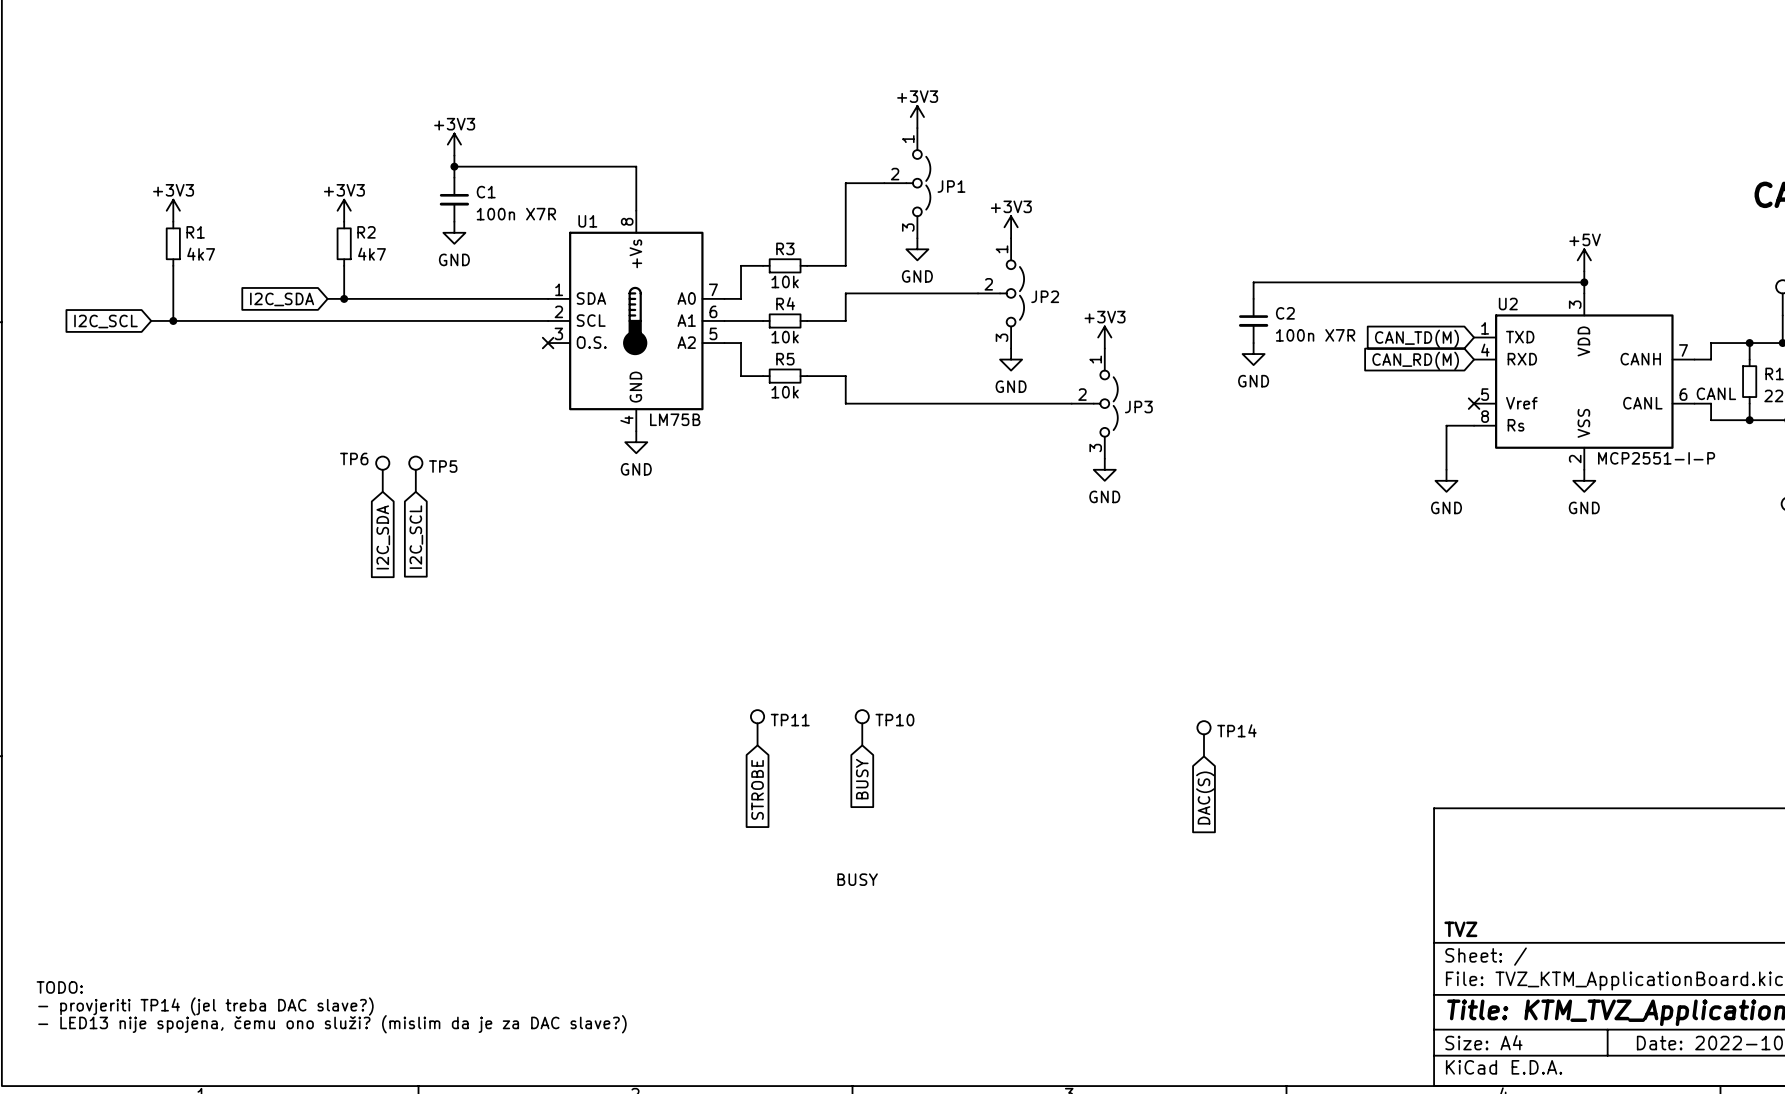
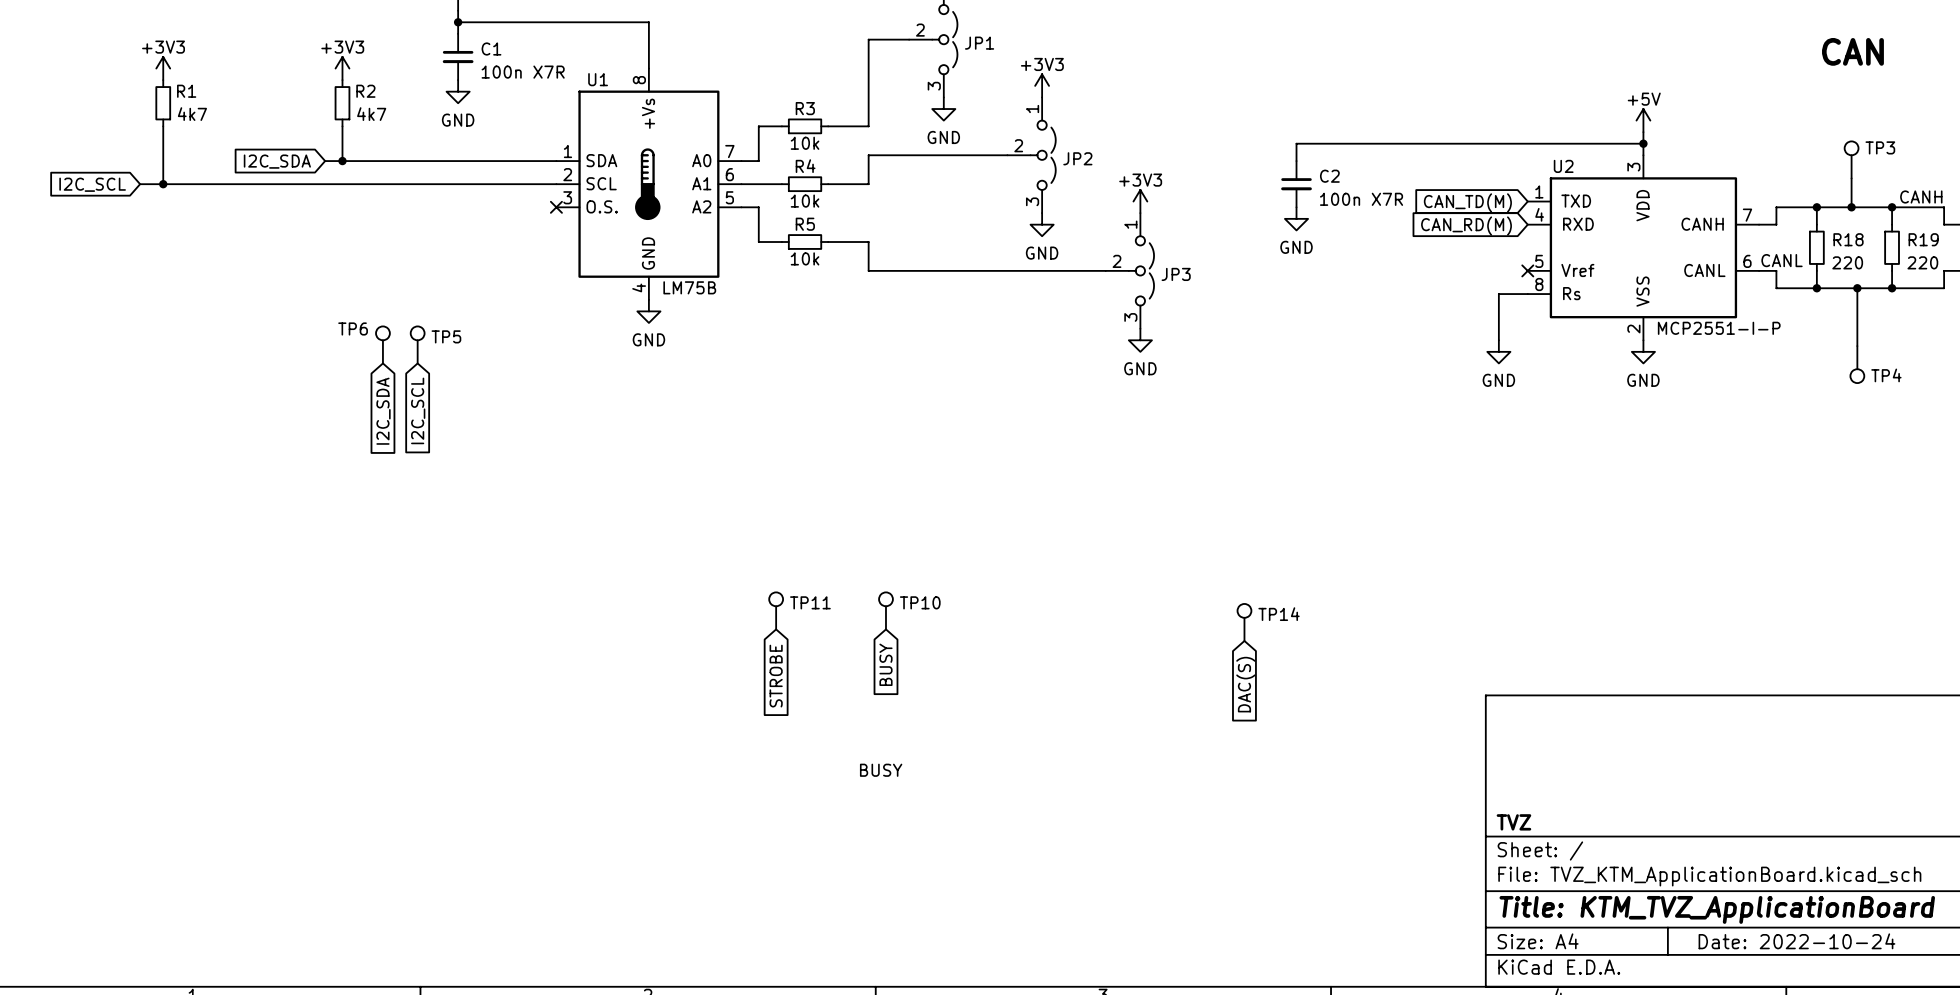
text: TODO: (59, 987) -> none
text: - provjeriti TP14 (jel treba DAC slave?) (205, 1006) -> none
text: - LED13 nije spojena, čemu ono služi? (mislim da je za DAC slave?) (332, 1024) -> none

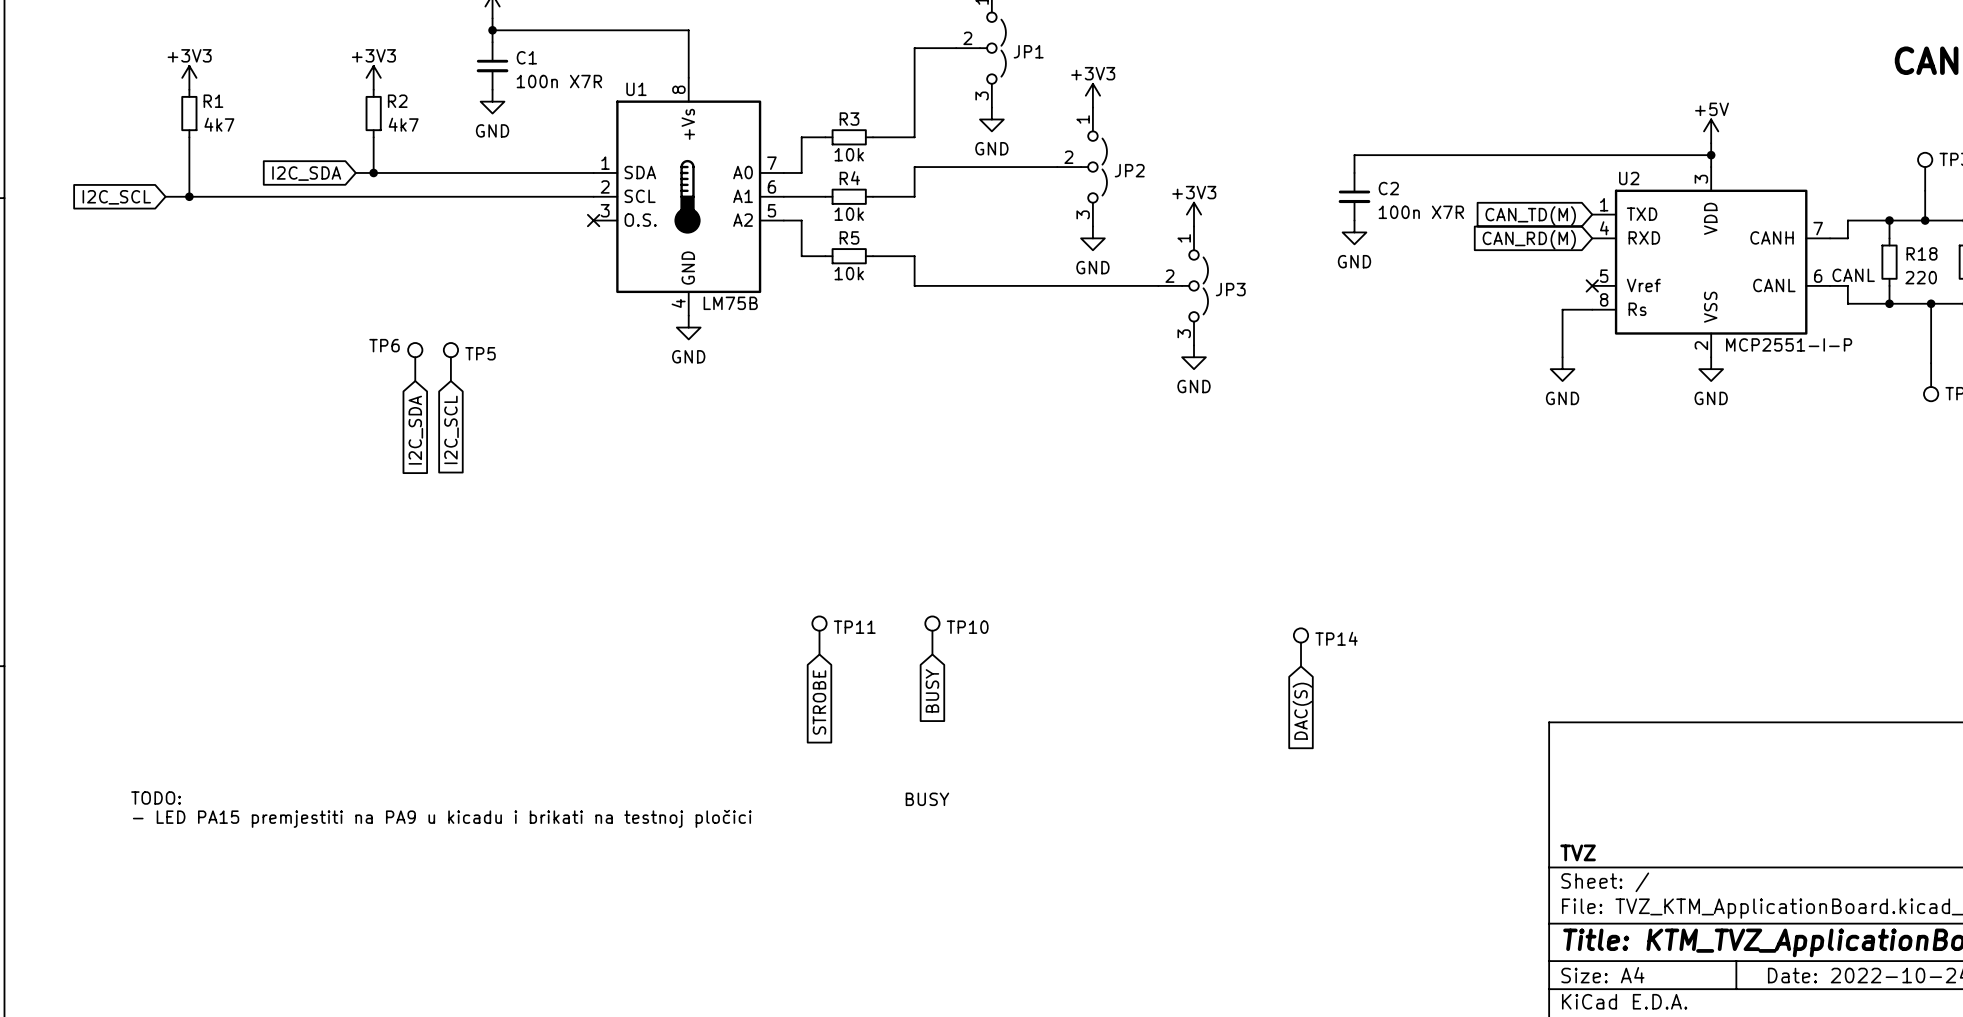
text: none -> TODO: (156, 798)
text: none -> - LED PA15 premjestiti na PA9 u kicadu i brikati na testnoj pločici (442, 818)

